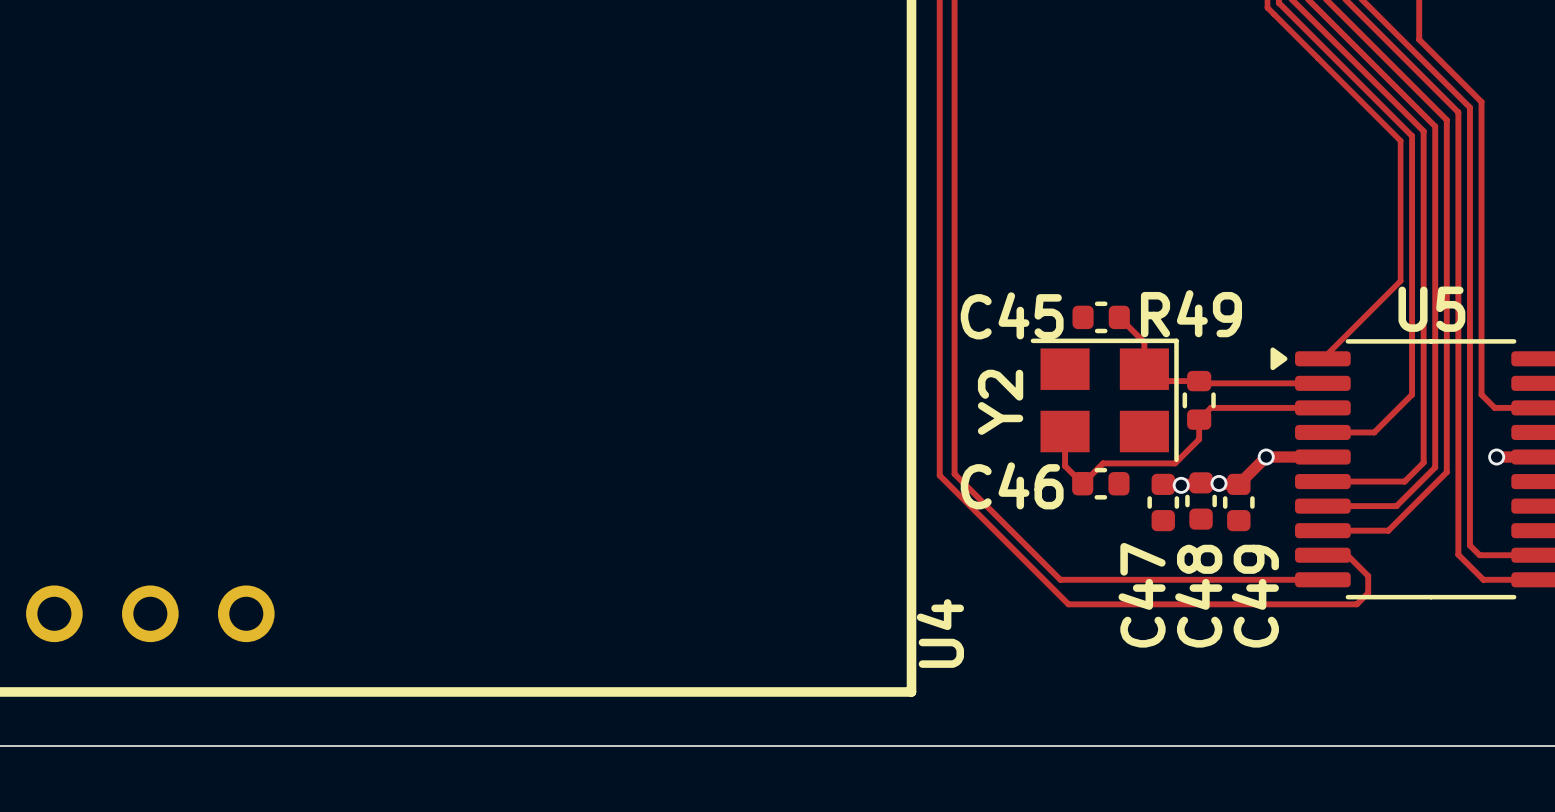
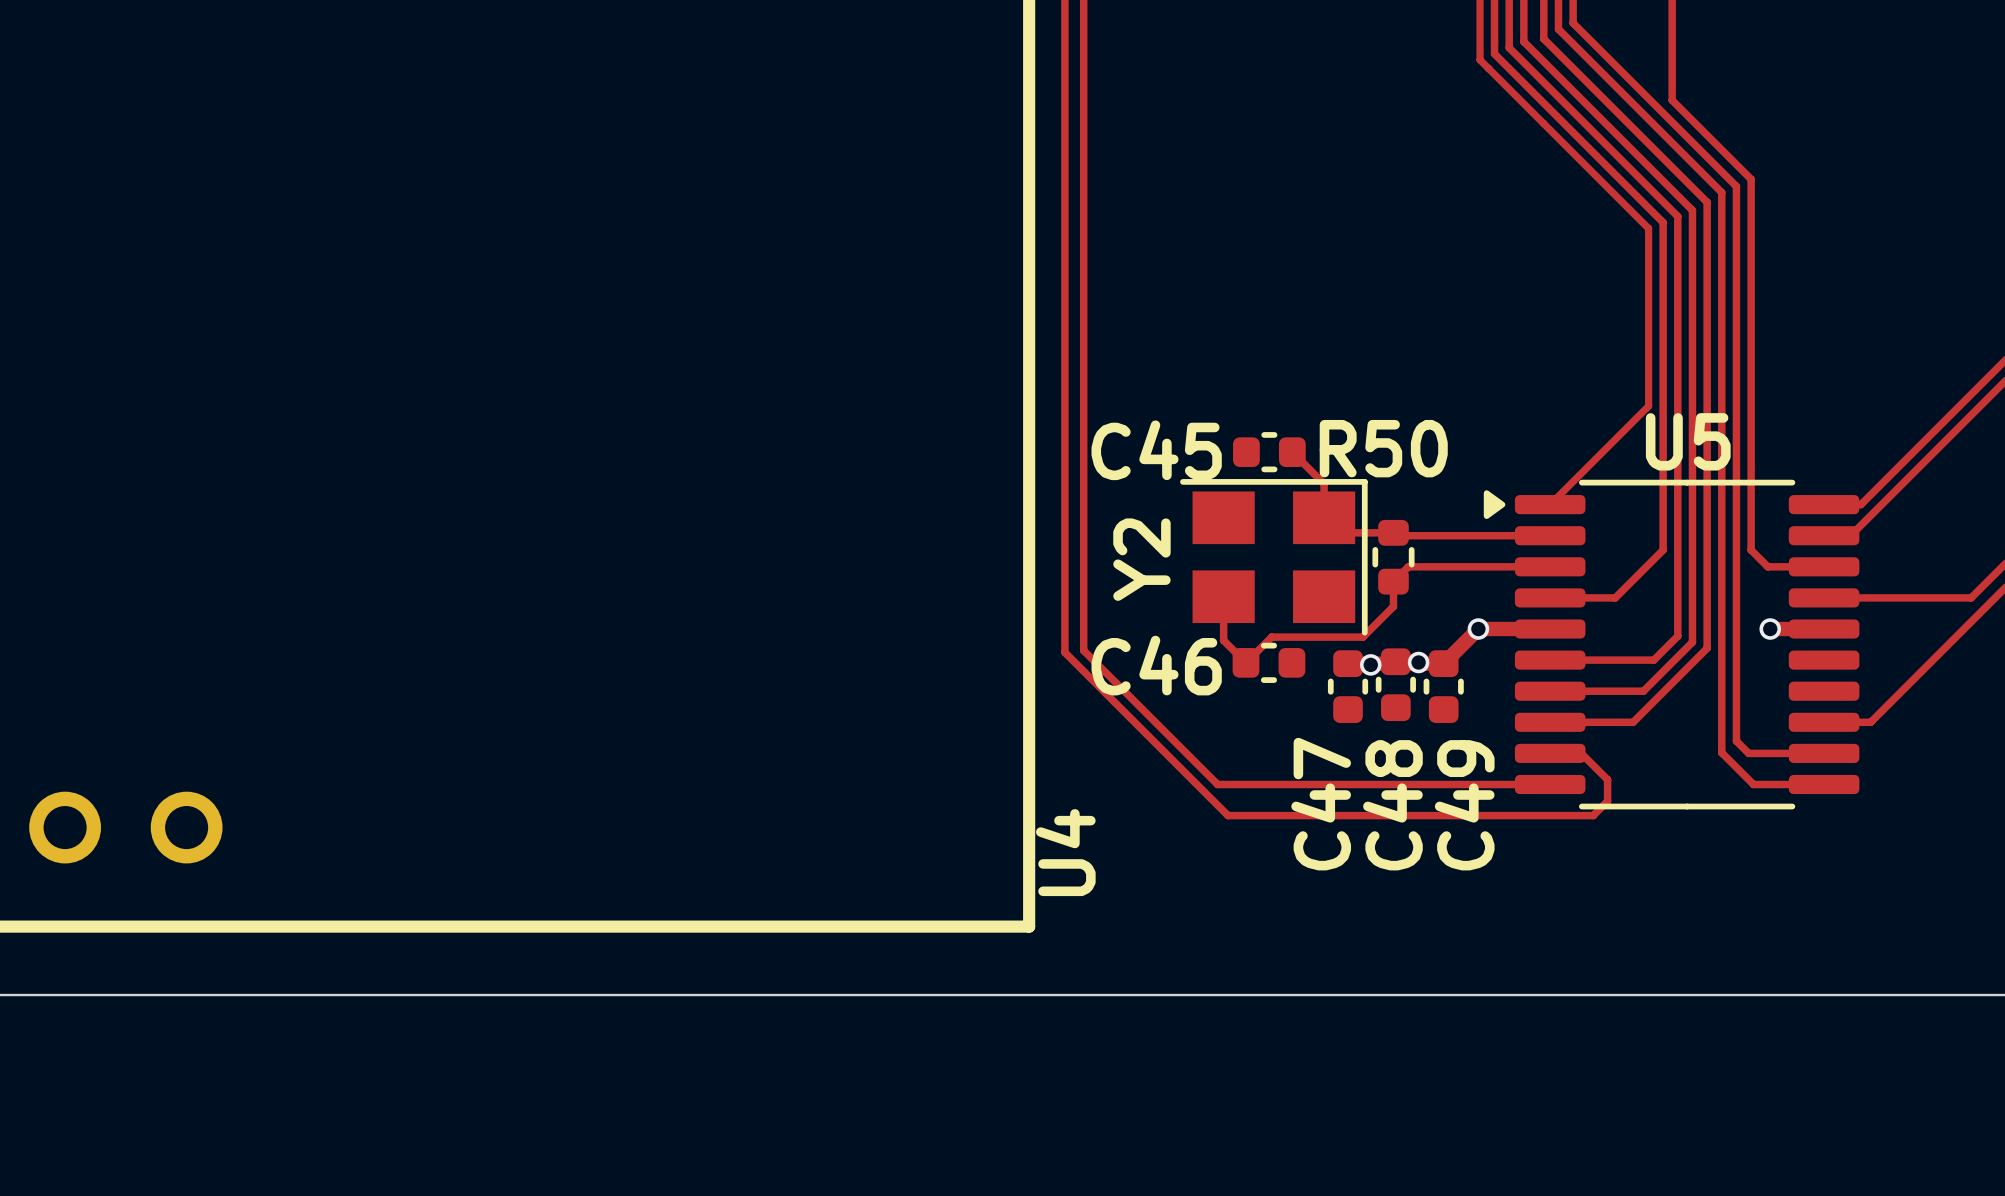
R49 name: R49 (1191, 313) -> R50 (1383, 448)

